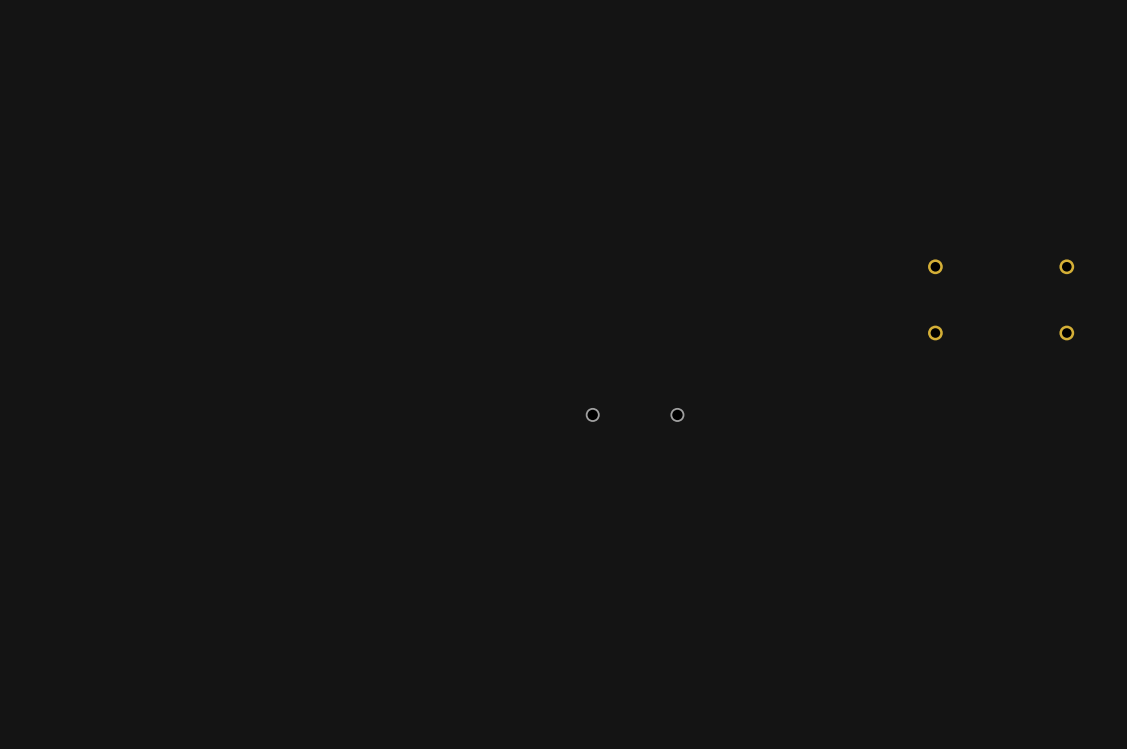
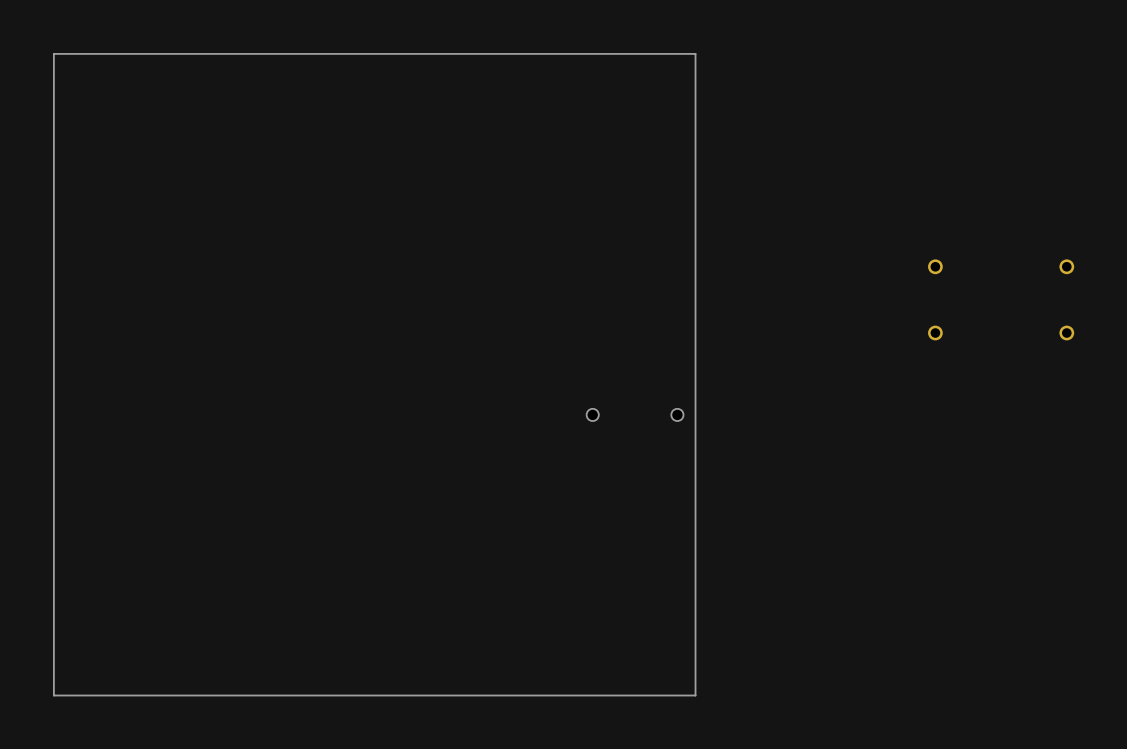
board edge: none -> (695, 53) (53, 53) (53, 695) (695, 695) (695, 53)

